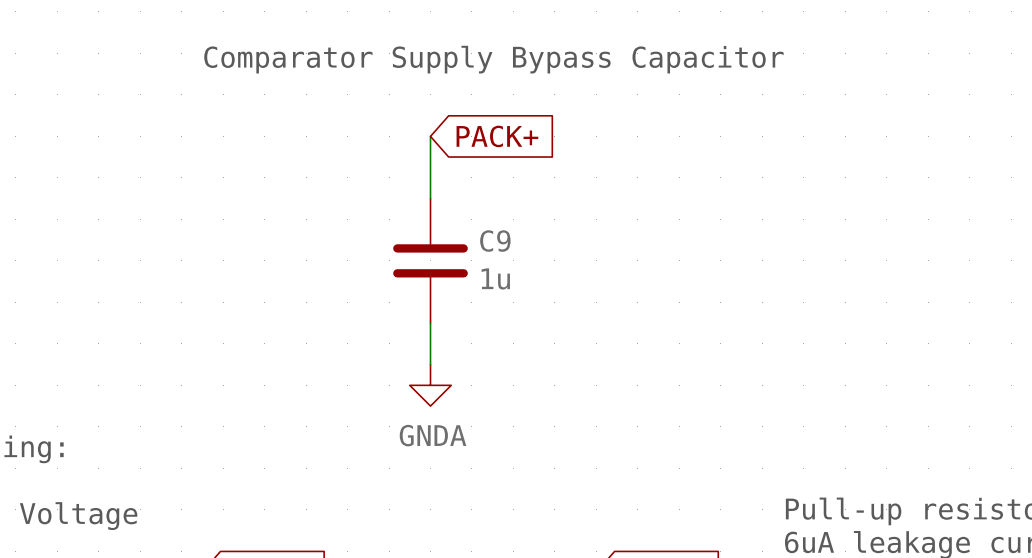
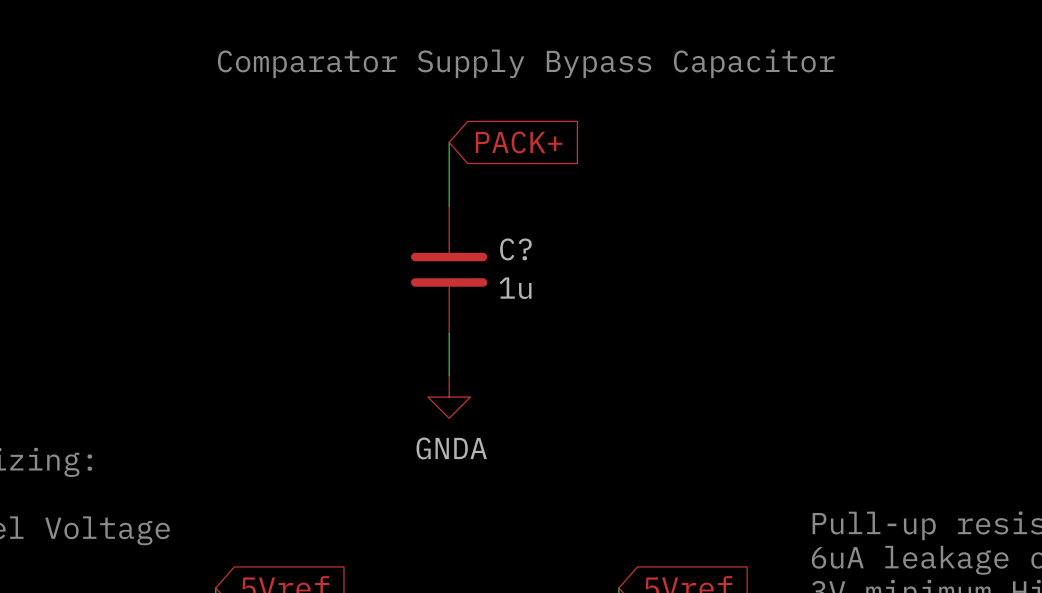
C9 name: C9 (495, 241) -> C? (515, 249)

